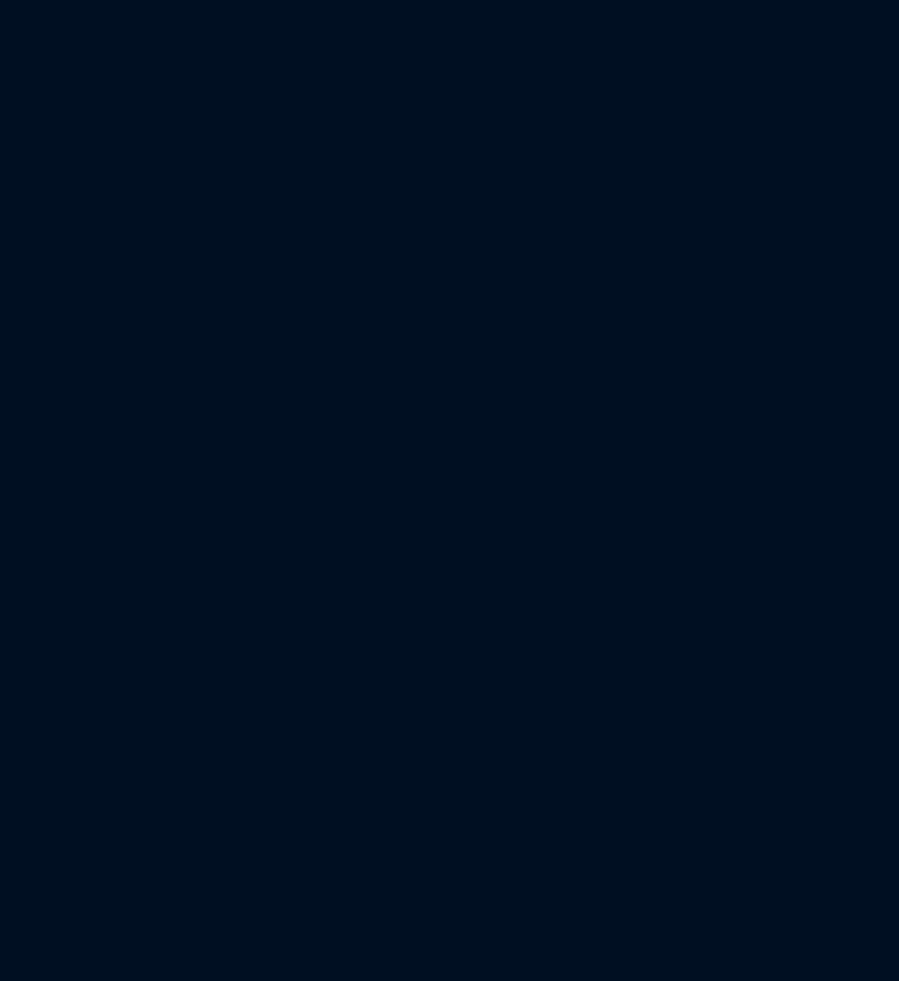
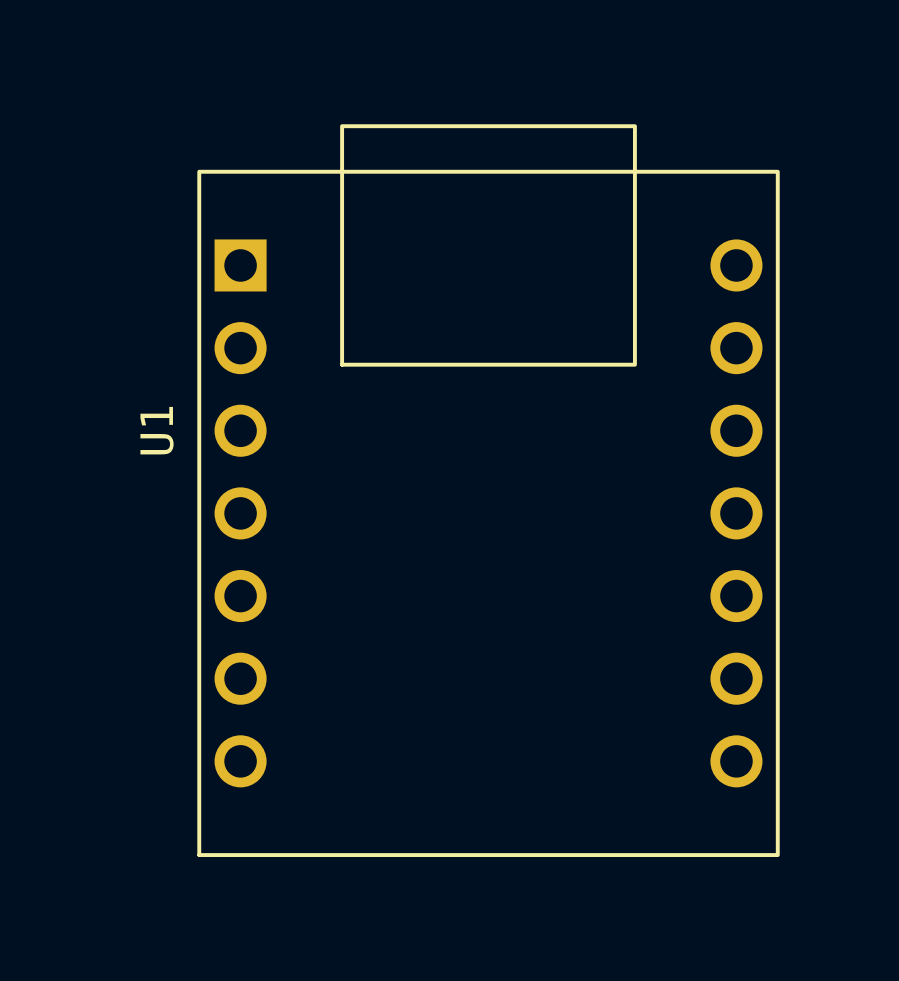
U1: none -> (488, 490)

